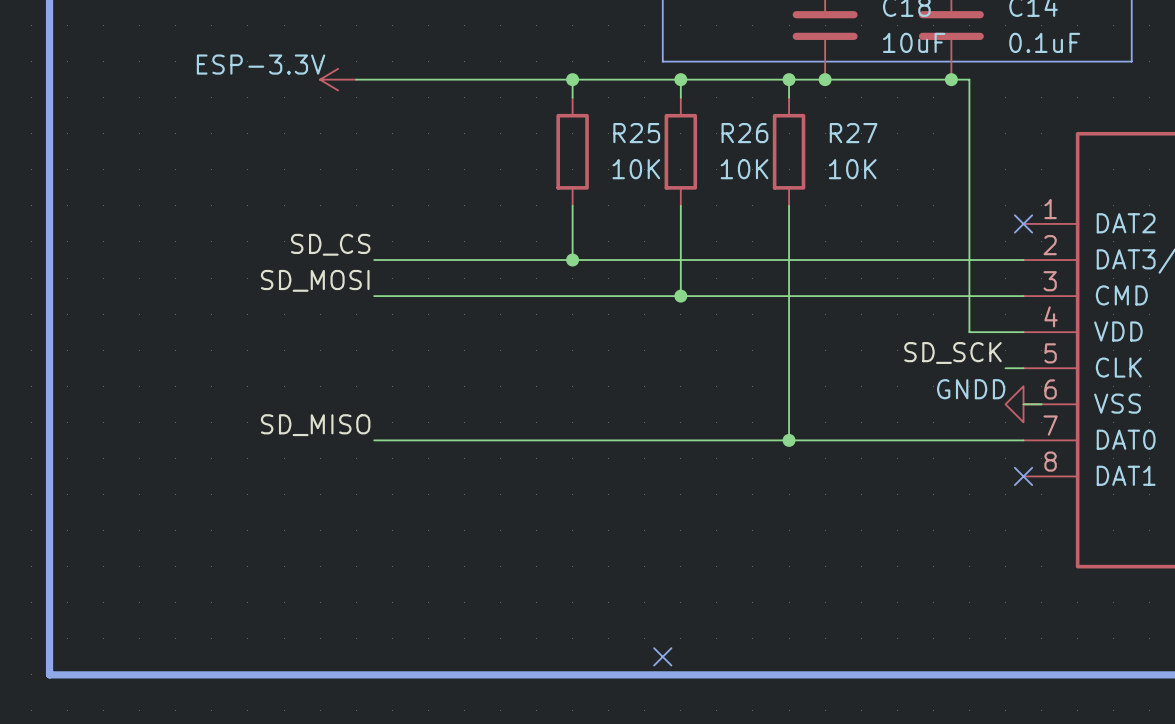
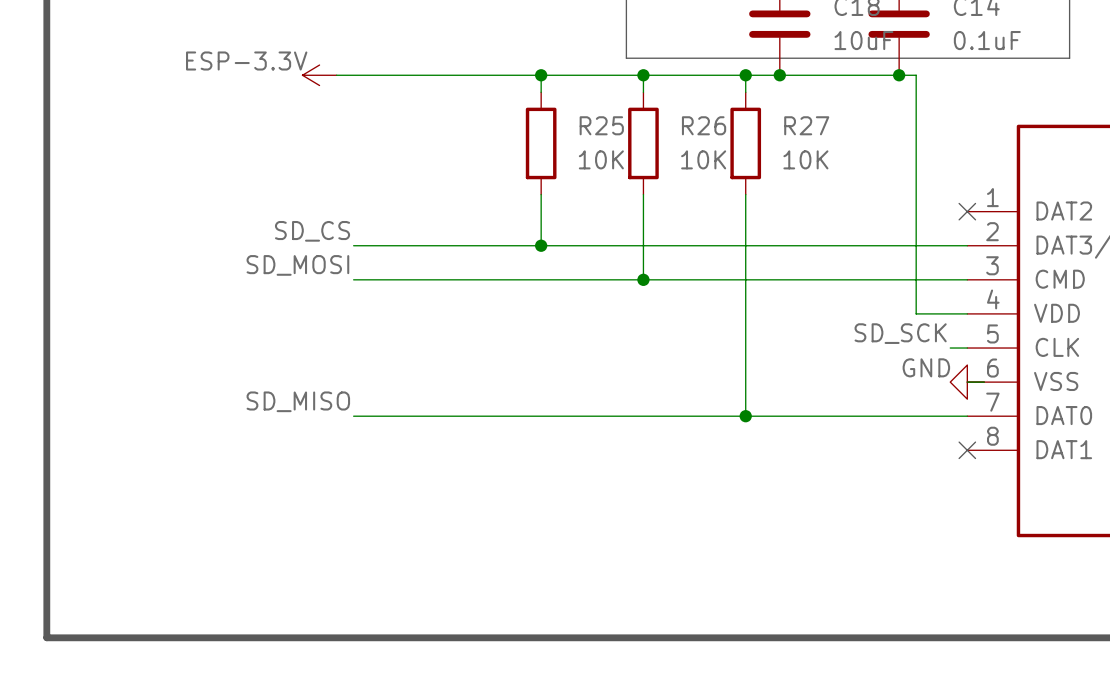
power symbol: GNDD (1023, 404) -> GND (967, 382)
no-connect mark: (662, 656) -> none

